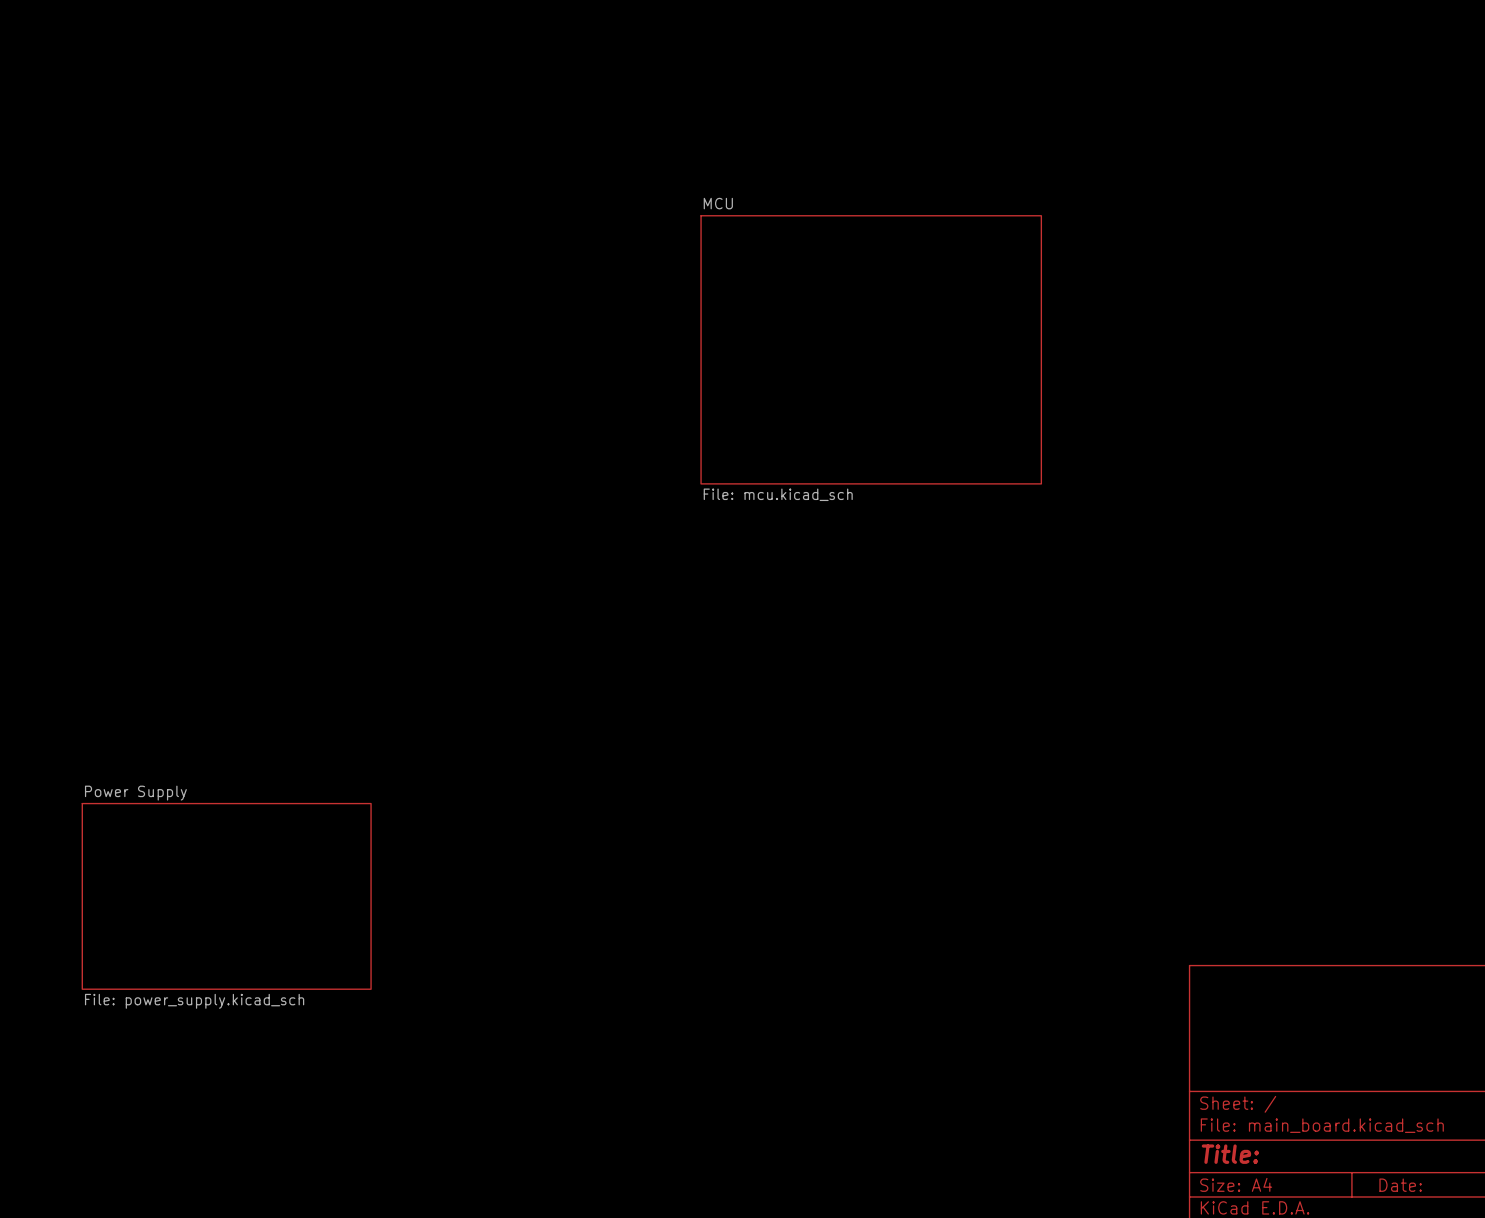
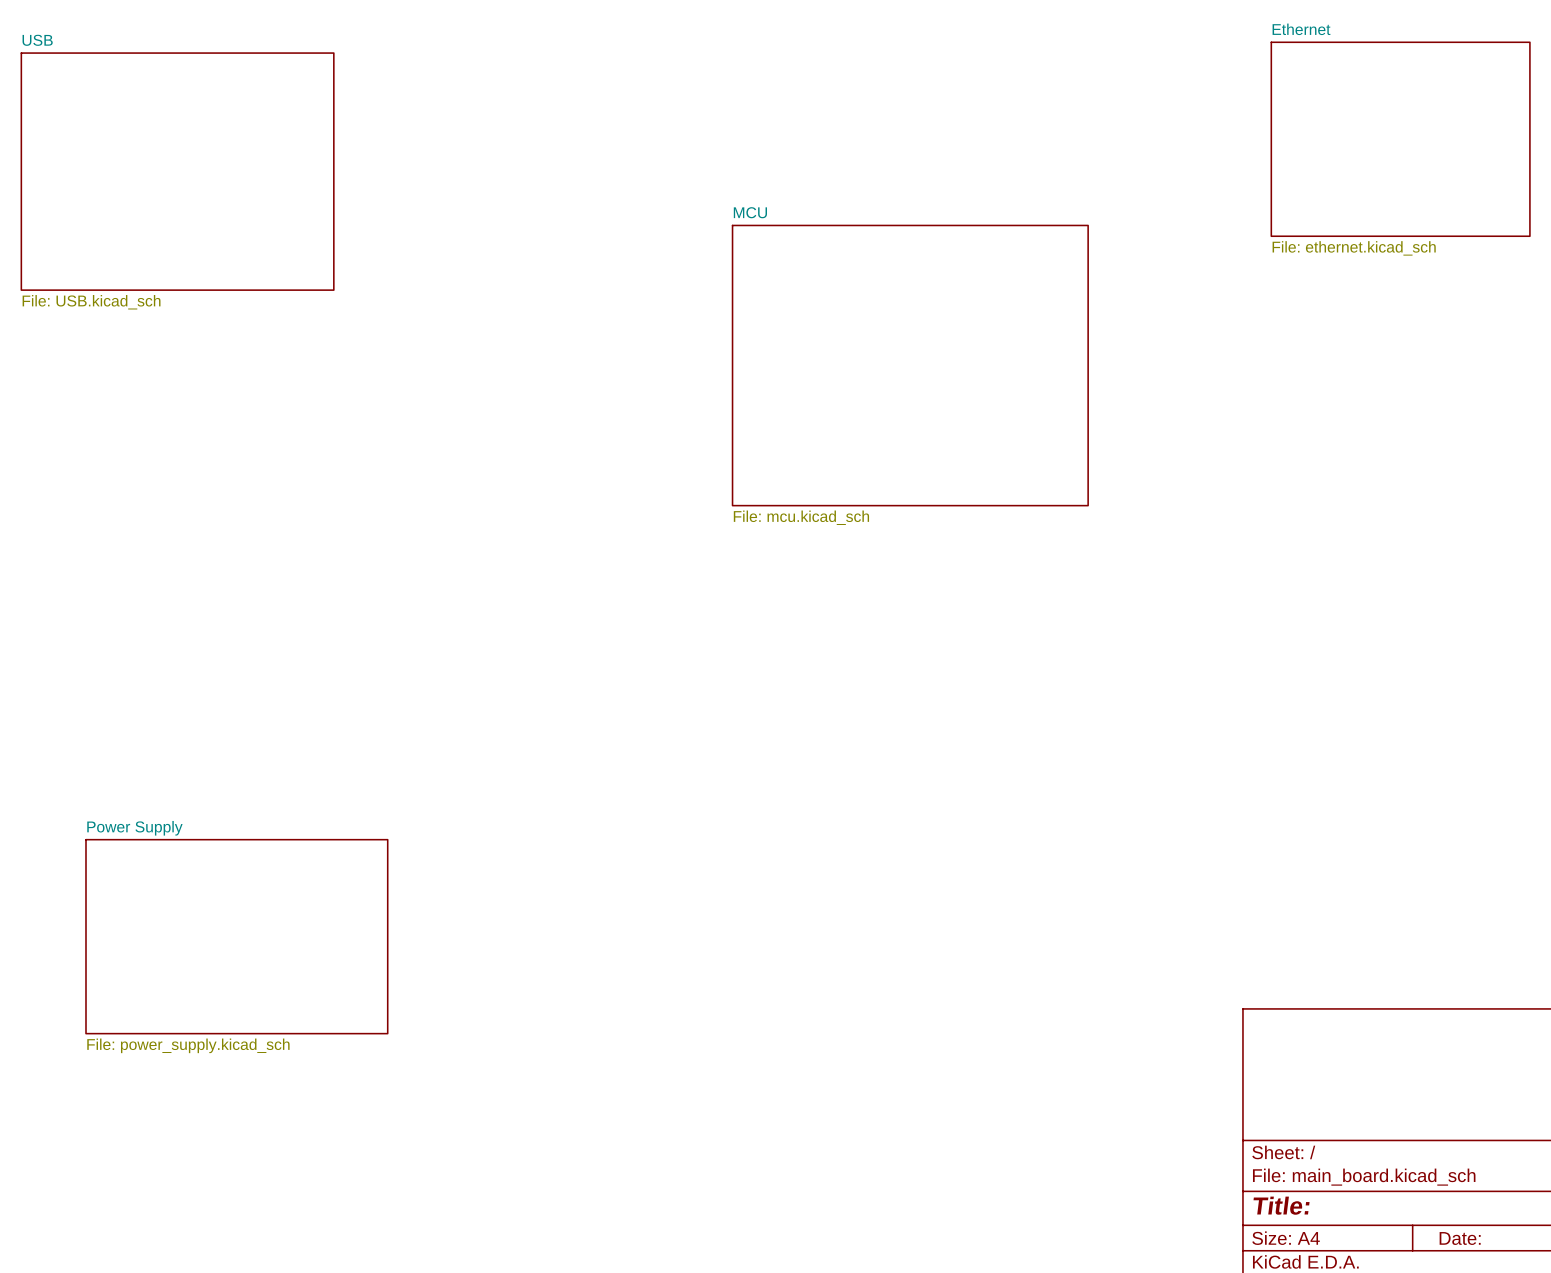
sheet Ethernet: none -> File: ethernet.kicad_sch (1400, 139)
sheet USB: none -> File: USB.kicad_sch (177, 171)

